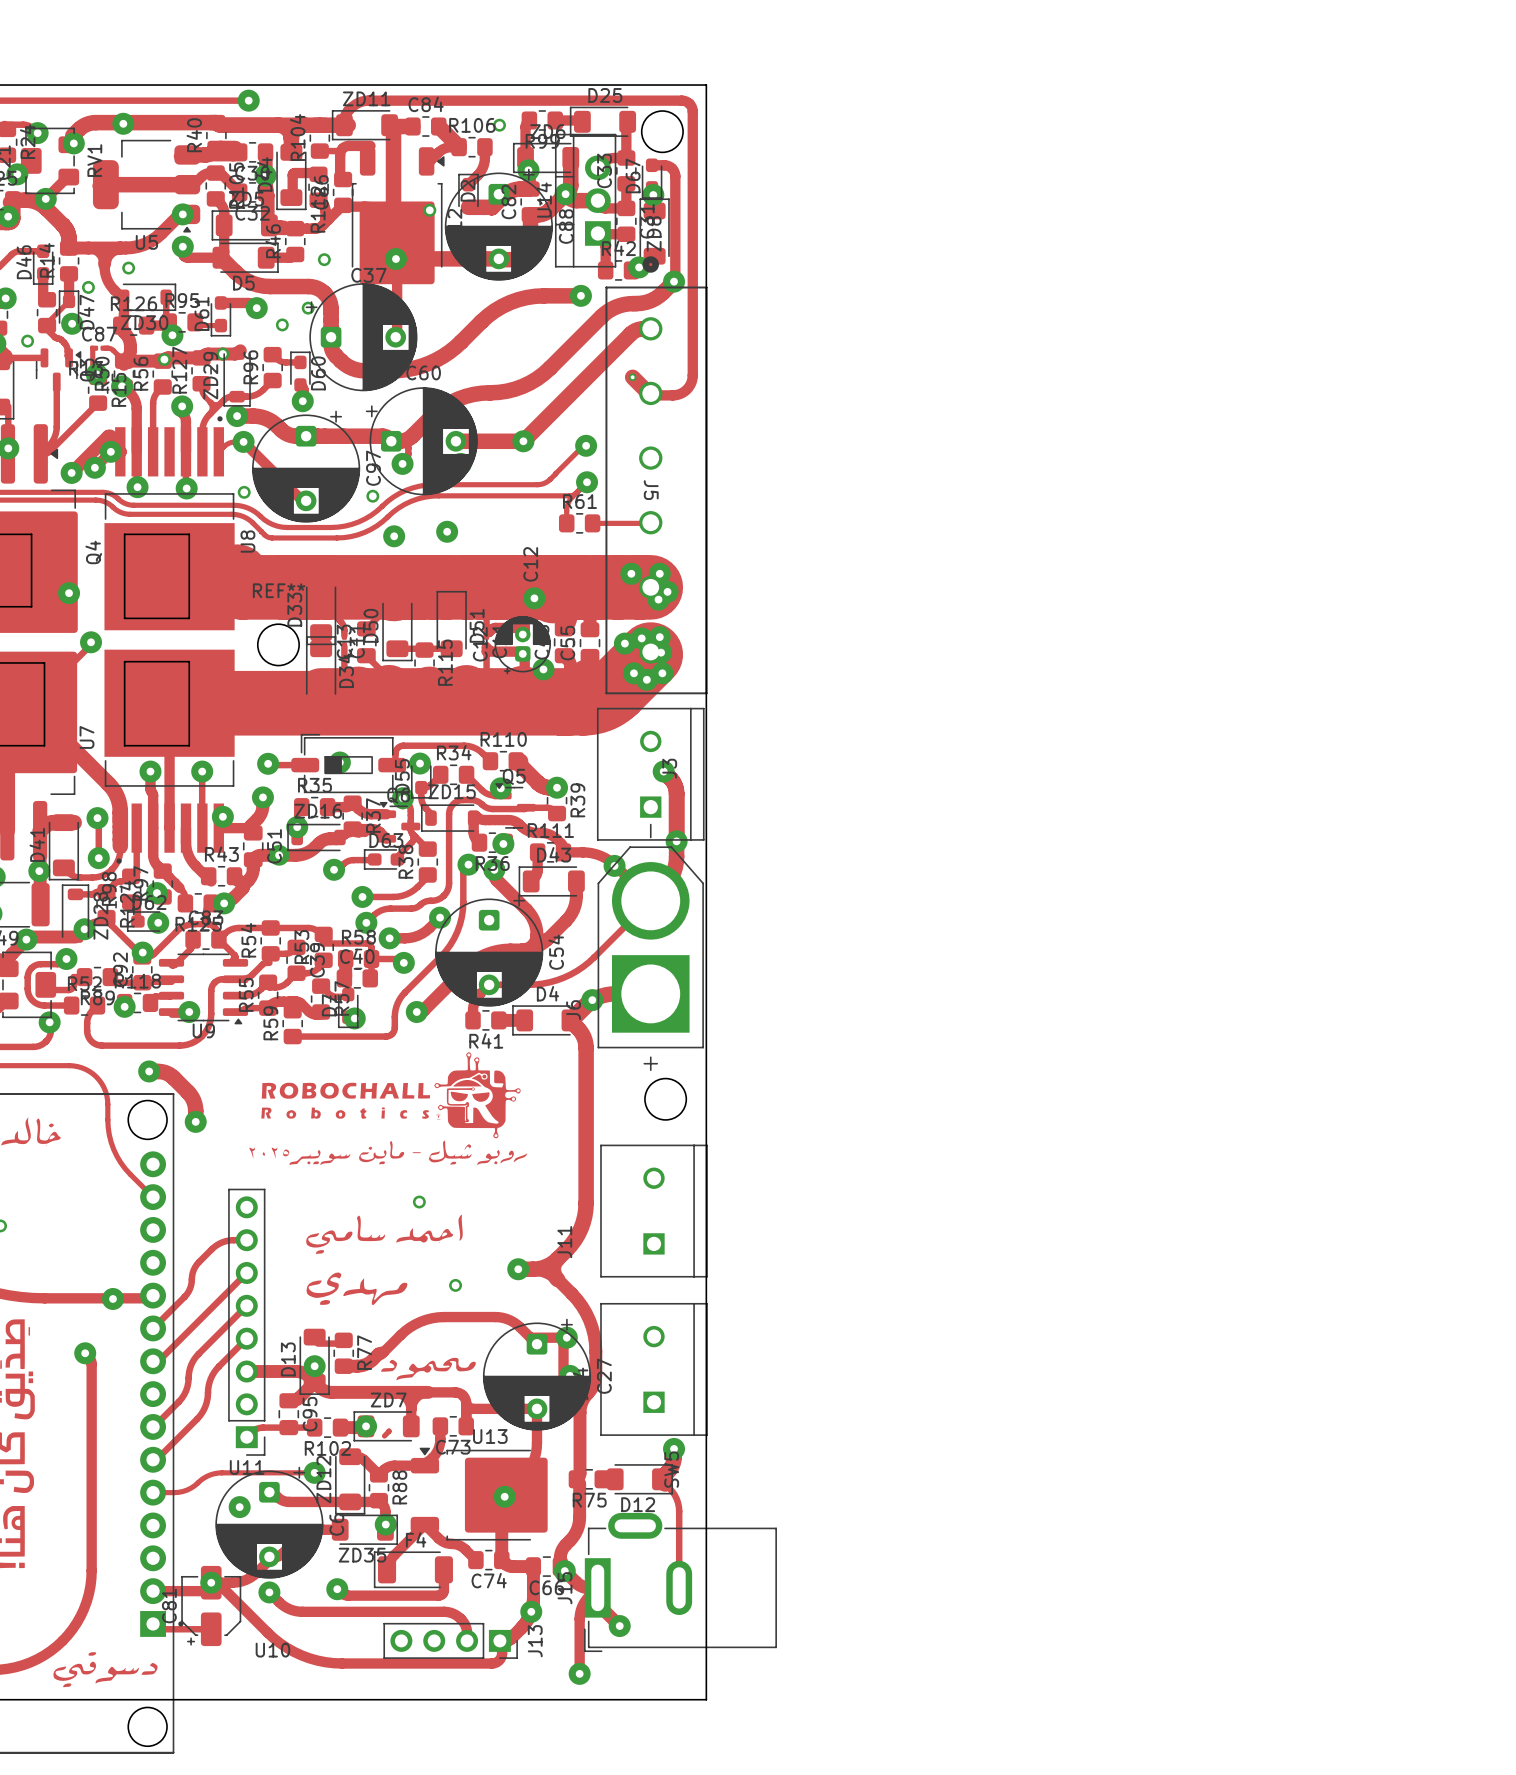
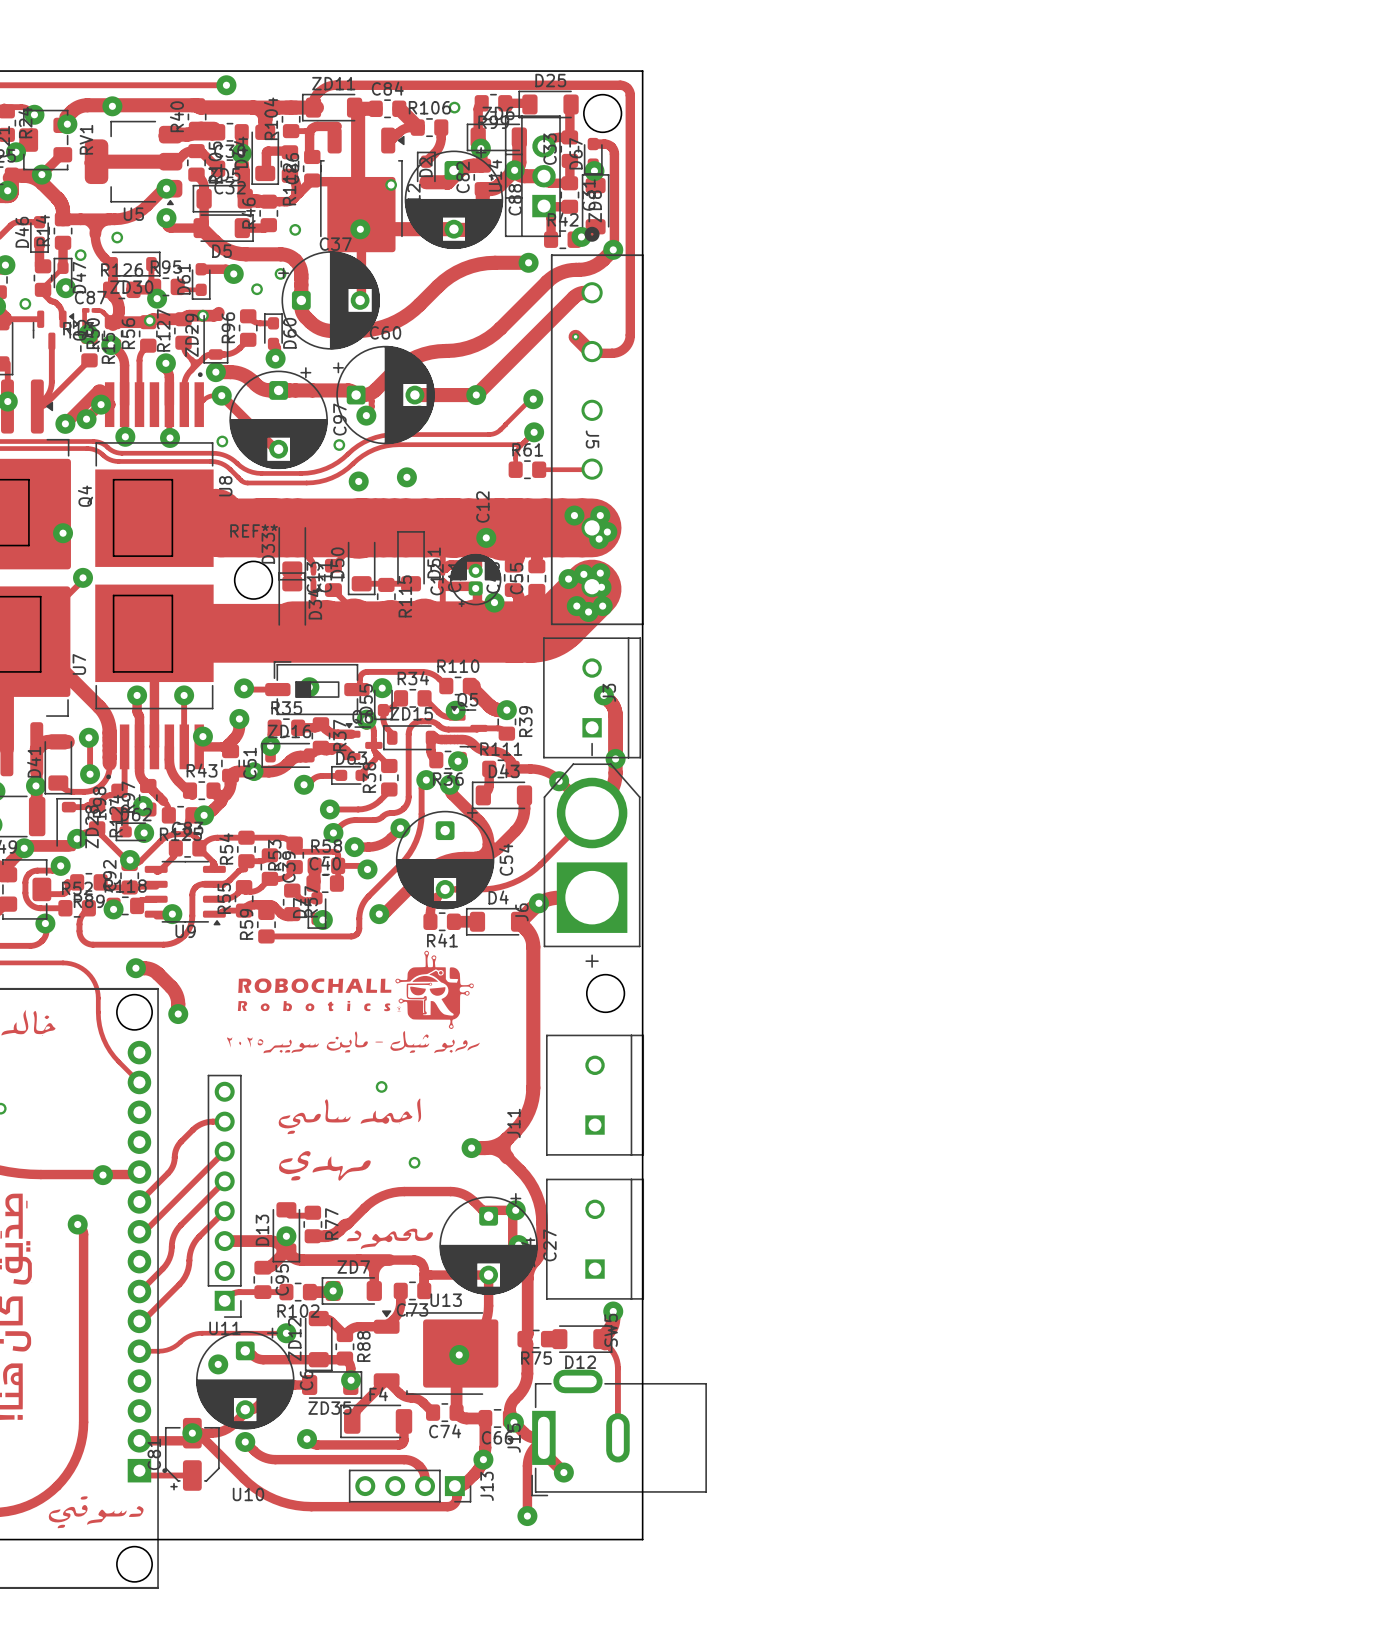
track: (388, 1430) (384, 1436) -> none

